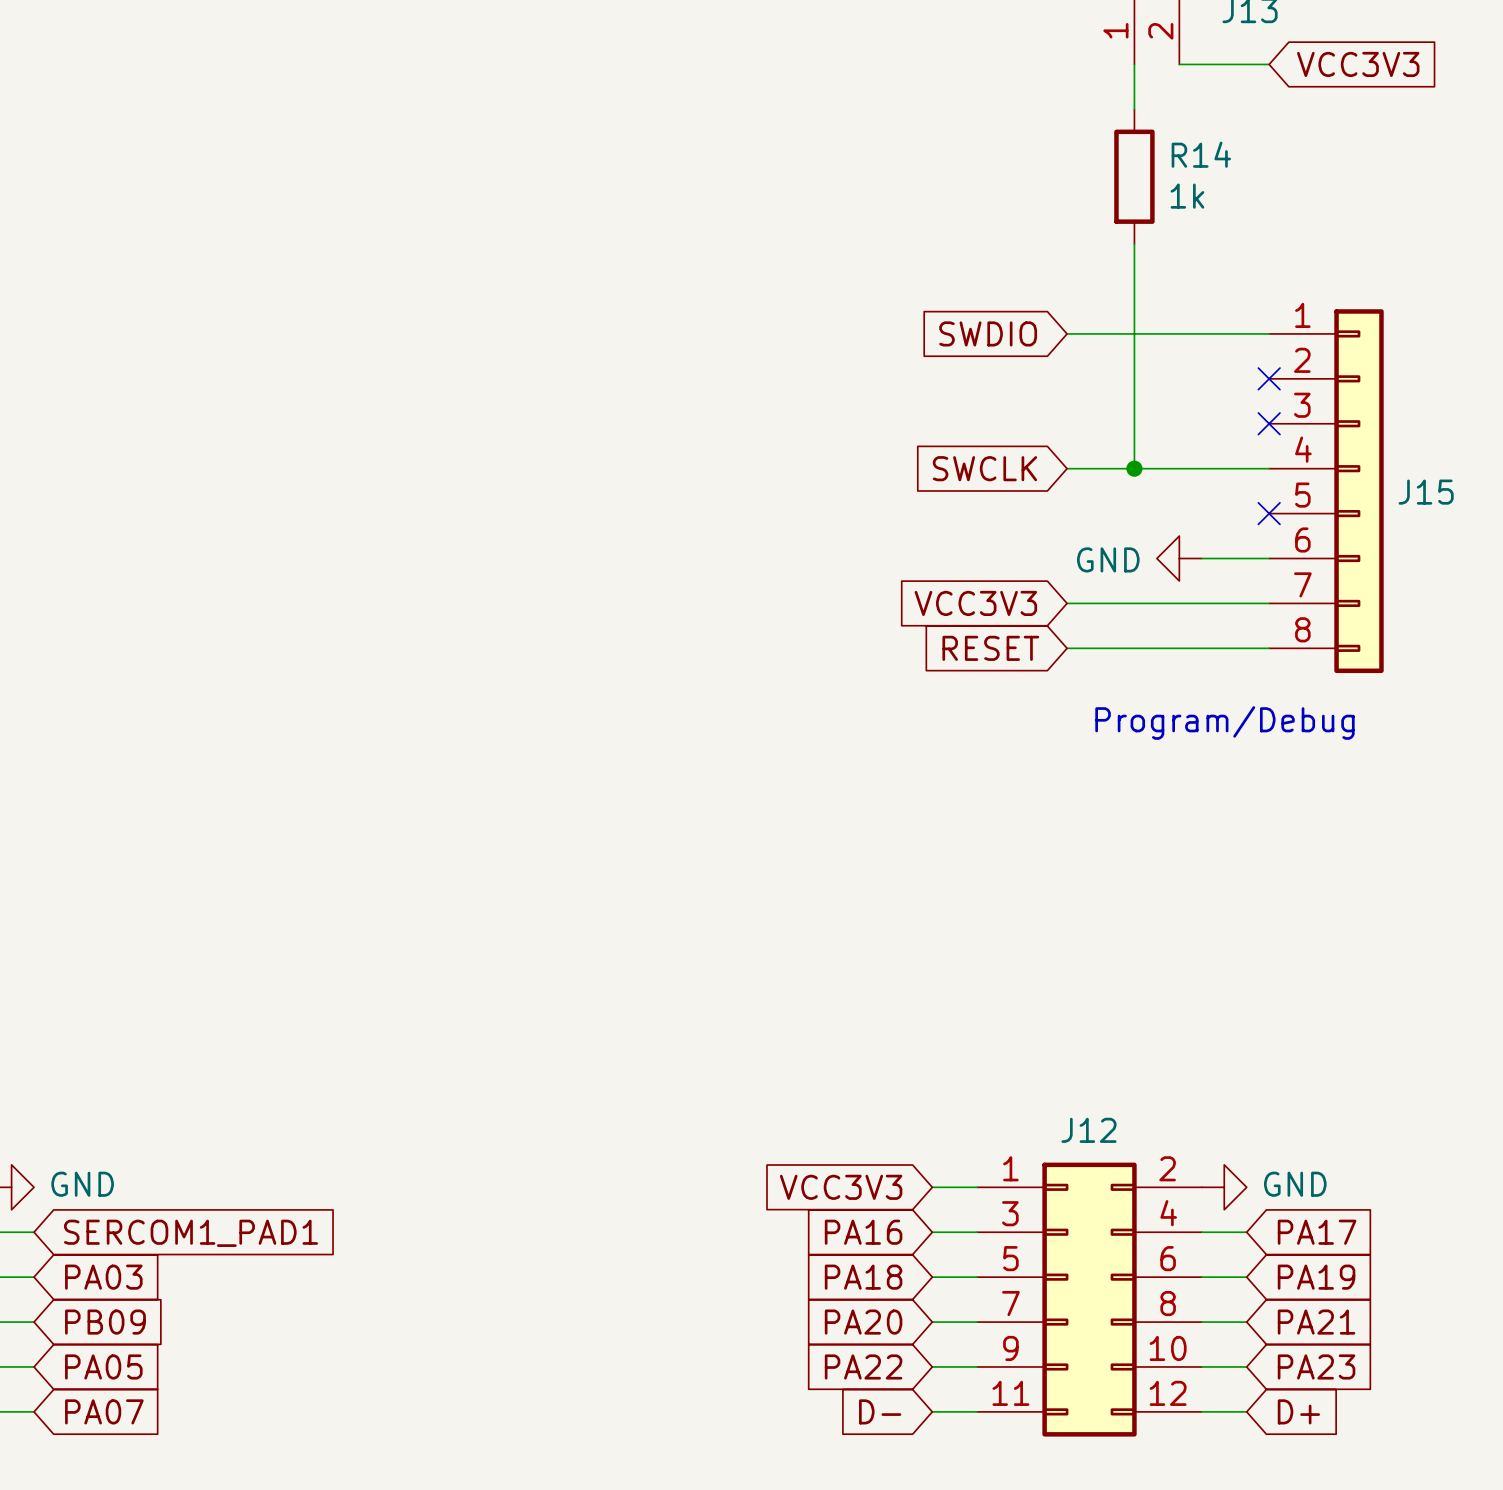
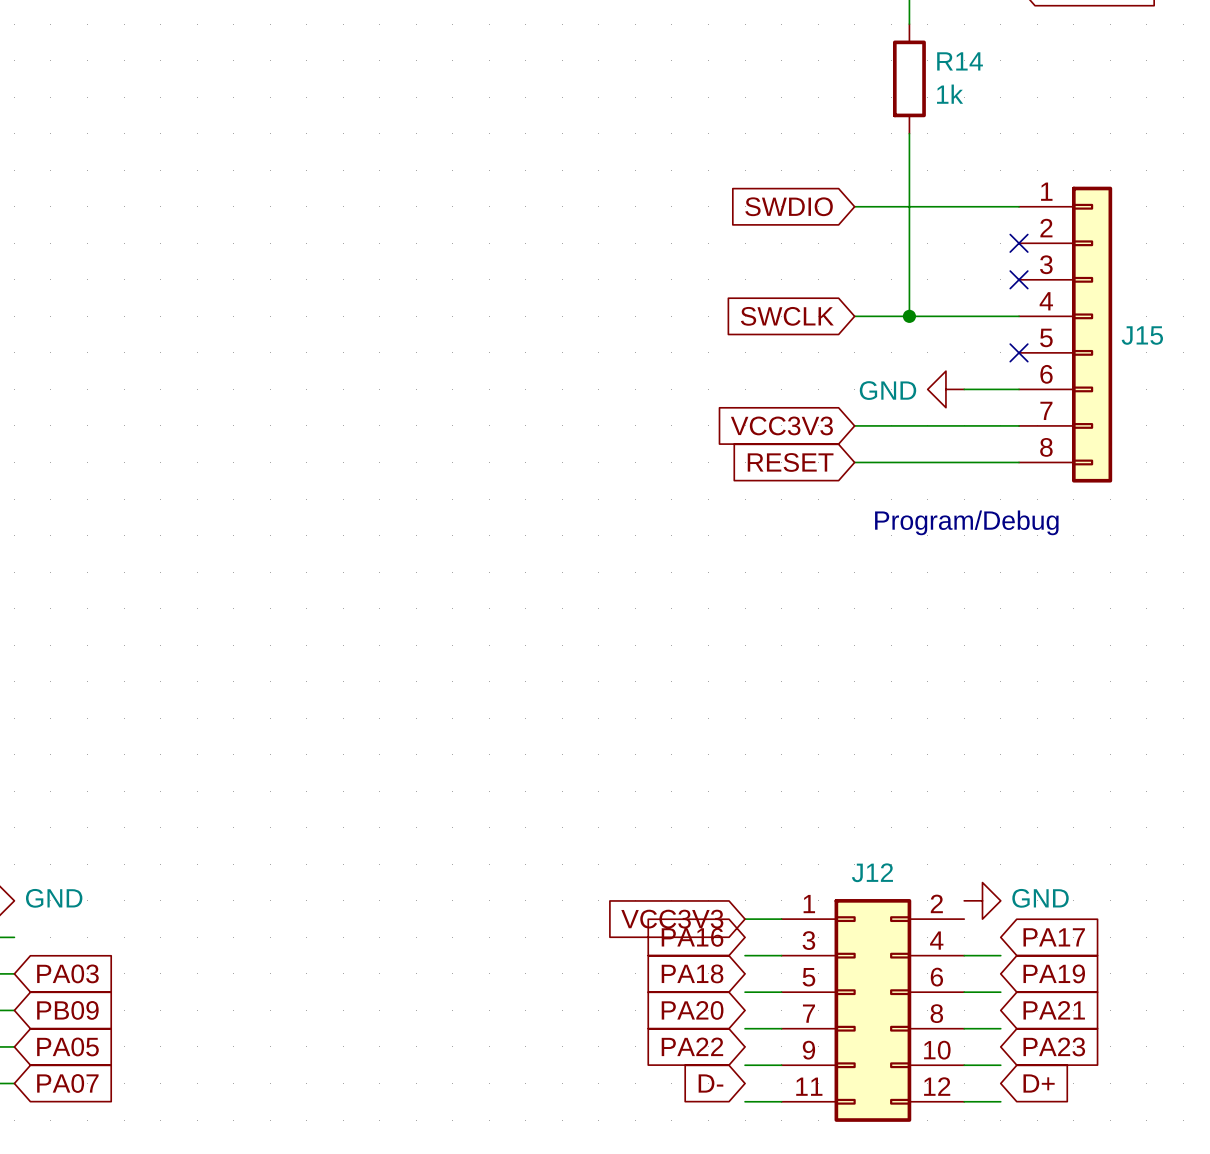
global label position: VCC3V3 (841, 1187) -> VCC3V3 (672, 919)
wire: (932, 1187) (977, 1187) -> (745, 919) (781, 919)
wire: (932, 1232) (977, 1232) -> (745, 955) (781, 955)
wire: (1201, 1232) (1246, 1232) -> (964, 955) (1000, 955)
global label: SERCOM1_PAD1 (190, 1233) -> none
wire: (932, 1277) (977, 1277) -> (745, 992) (781, 992)
wire: (1201, 1277) (1246, 1277) -> (964, 992) (1000, 992)
J12 position: (1089, 1299) -> (872, 1010)
wire: (932, 1322) (977, 1322) -> (745, 1028) (781, 1028)
wire: (1201, 1322) (1246, 1322) -> (964, 1028) (1000, 1028)
wire: (932, 1366) (977, 1366) -> (745, 1065) (781, 1065)
wire: (1201, 1366) (1246, 1366) -> (964, 1065) (1000, 1065)
wire: (932, 1411) (977, 1411) -> (745, 1101) (781, 1101)
wire: (1201, 1411) (1246, 1411) -> (964, 1101) (1000, 1101)

